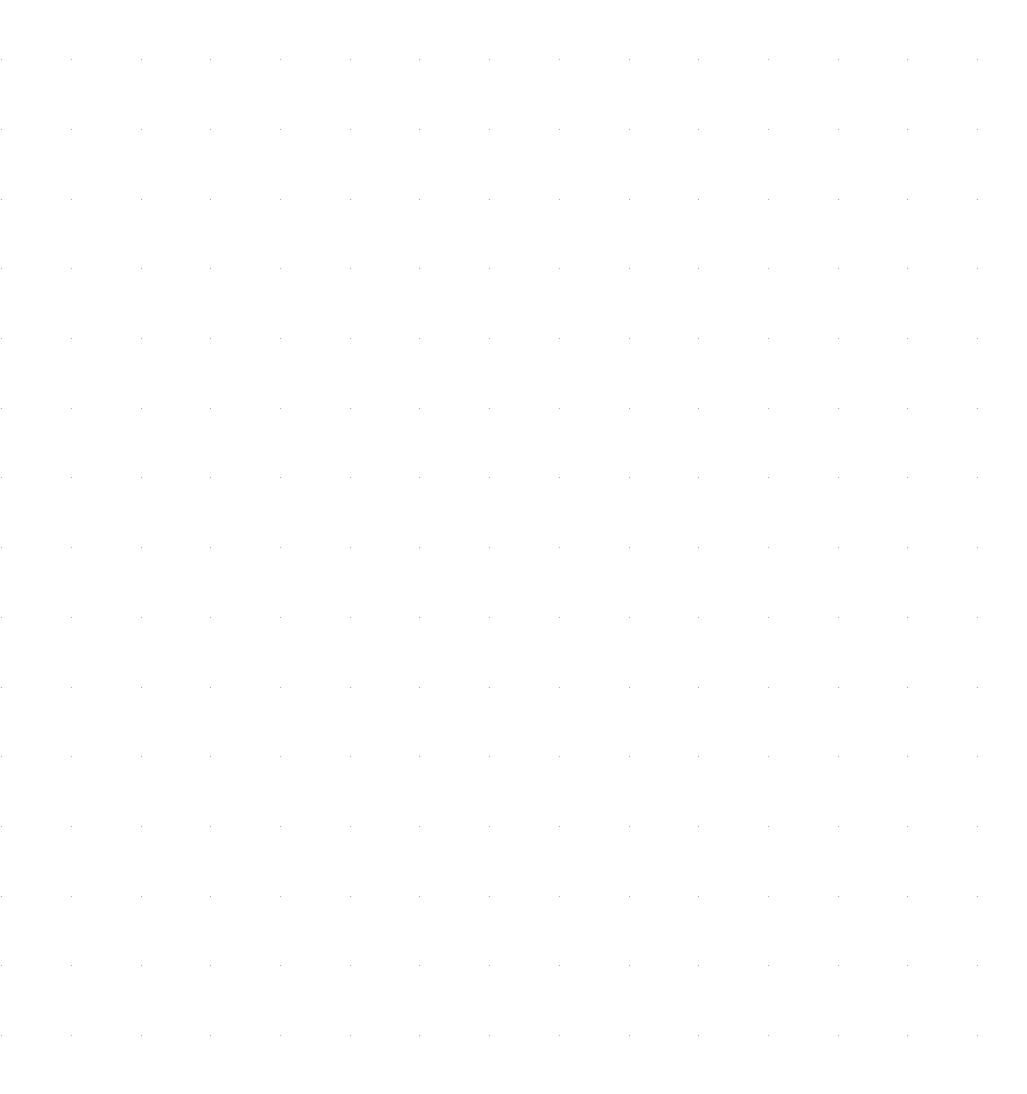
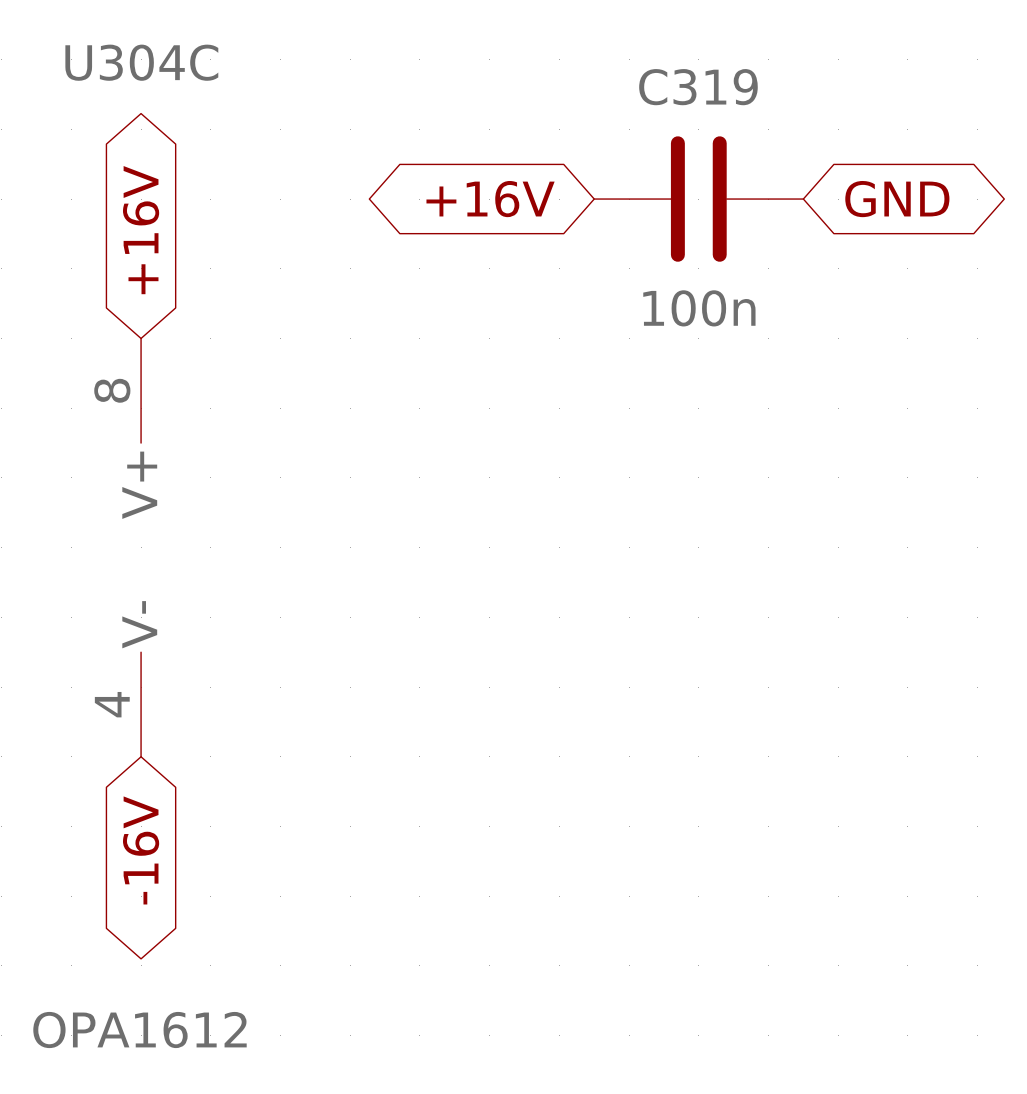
global label: none -> +16V (490, 199)
C319: none -> 100n (698, 199)
global label: none -> GND (897, 199)
global label: none -> +16V (141, 230)
U304C: none -> OPA1612 (141, 547)
global label: none -> -16V (141, 850)

